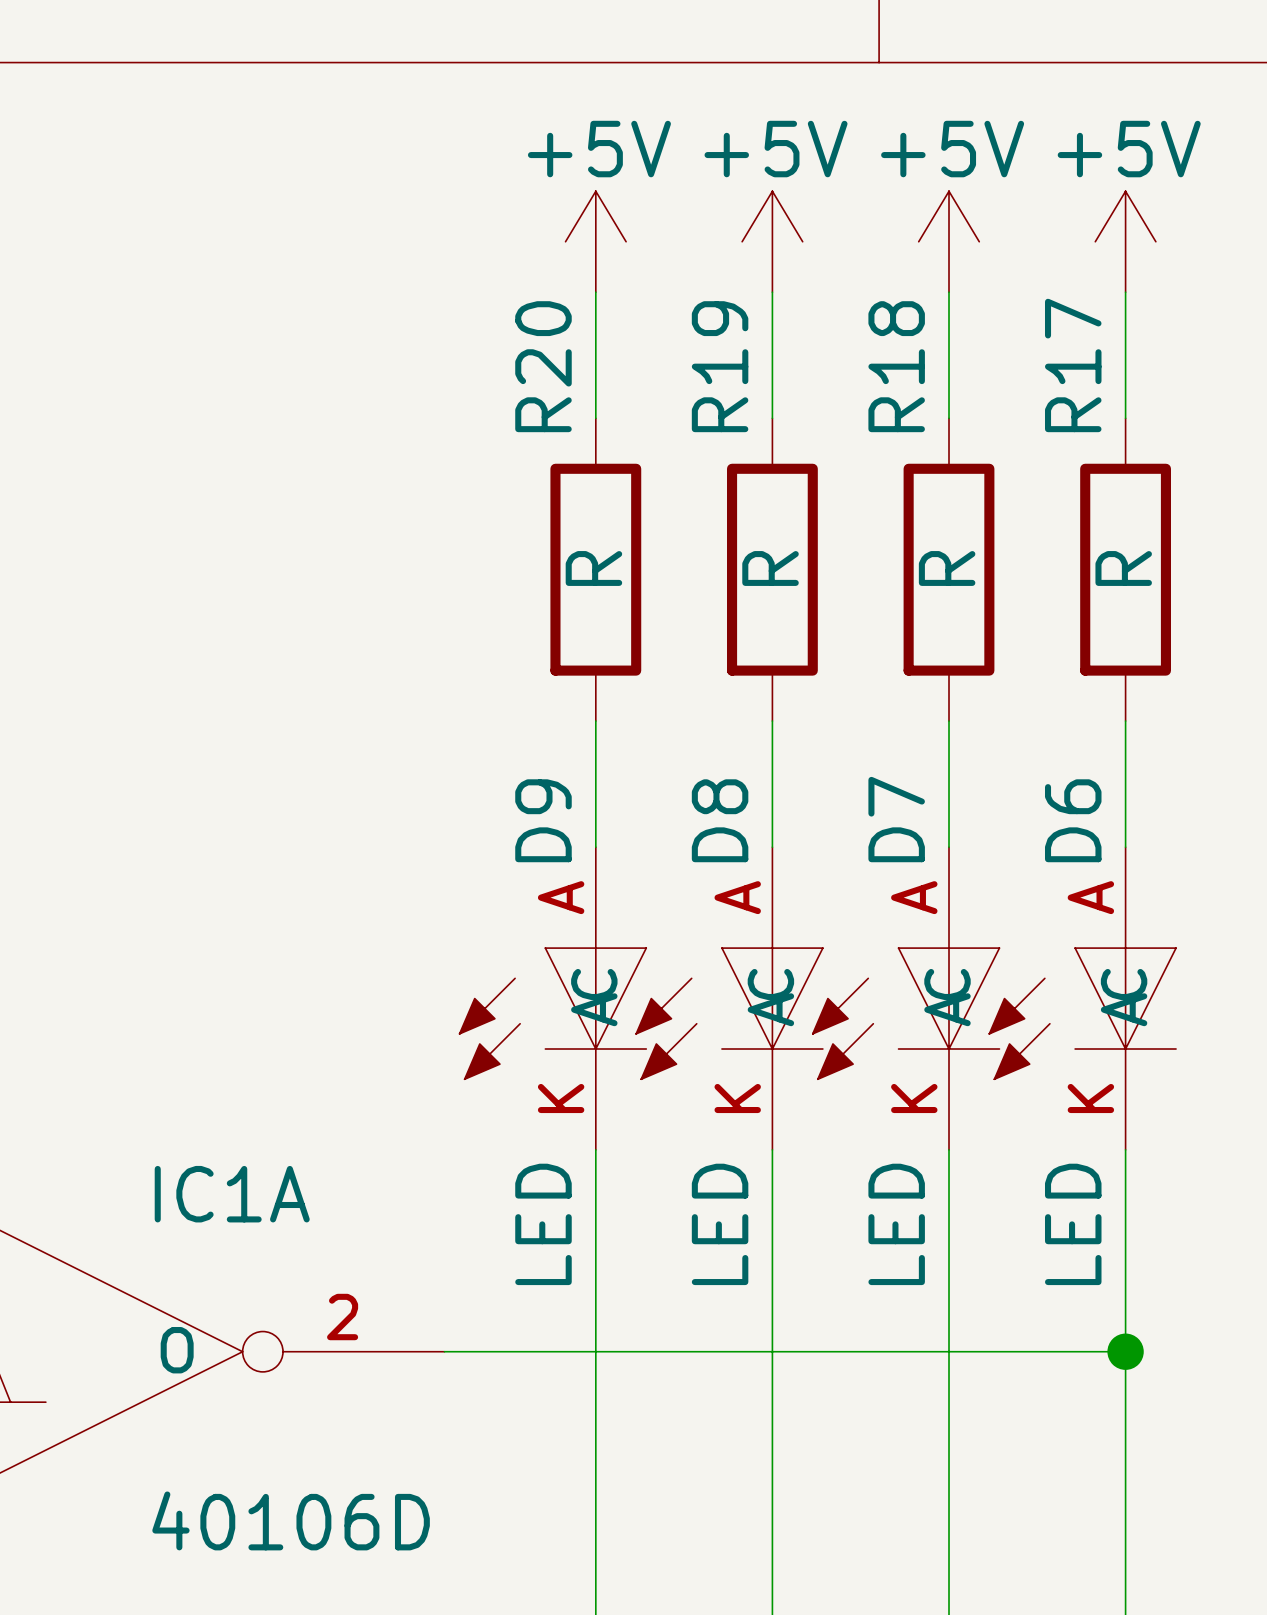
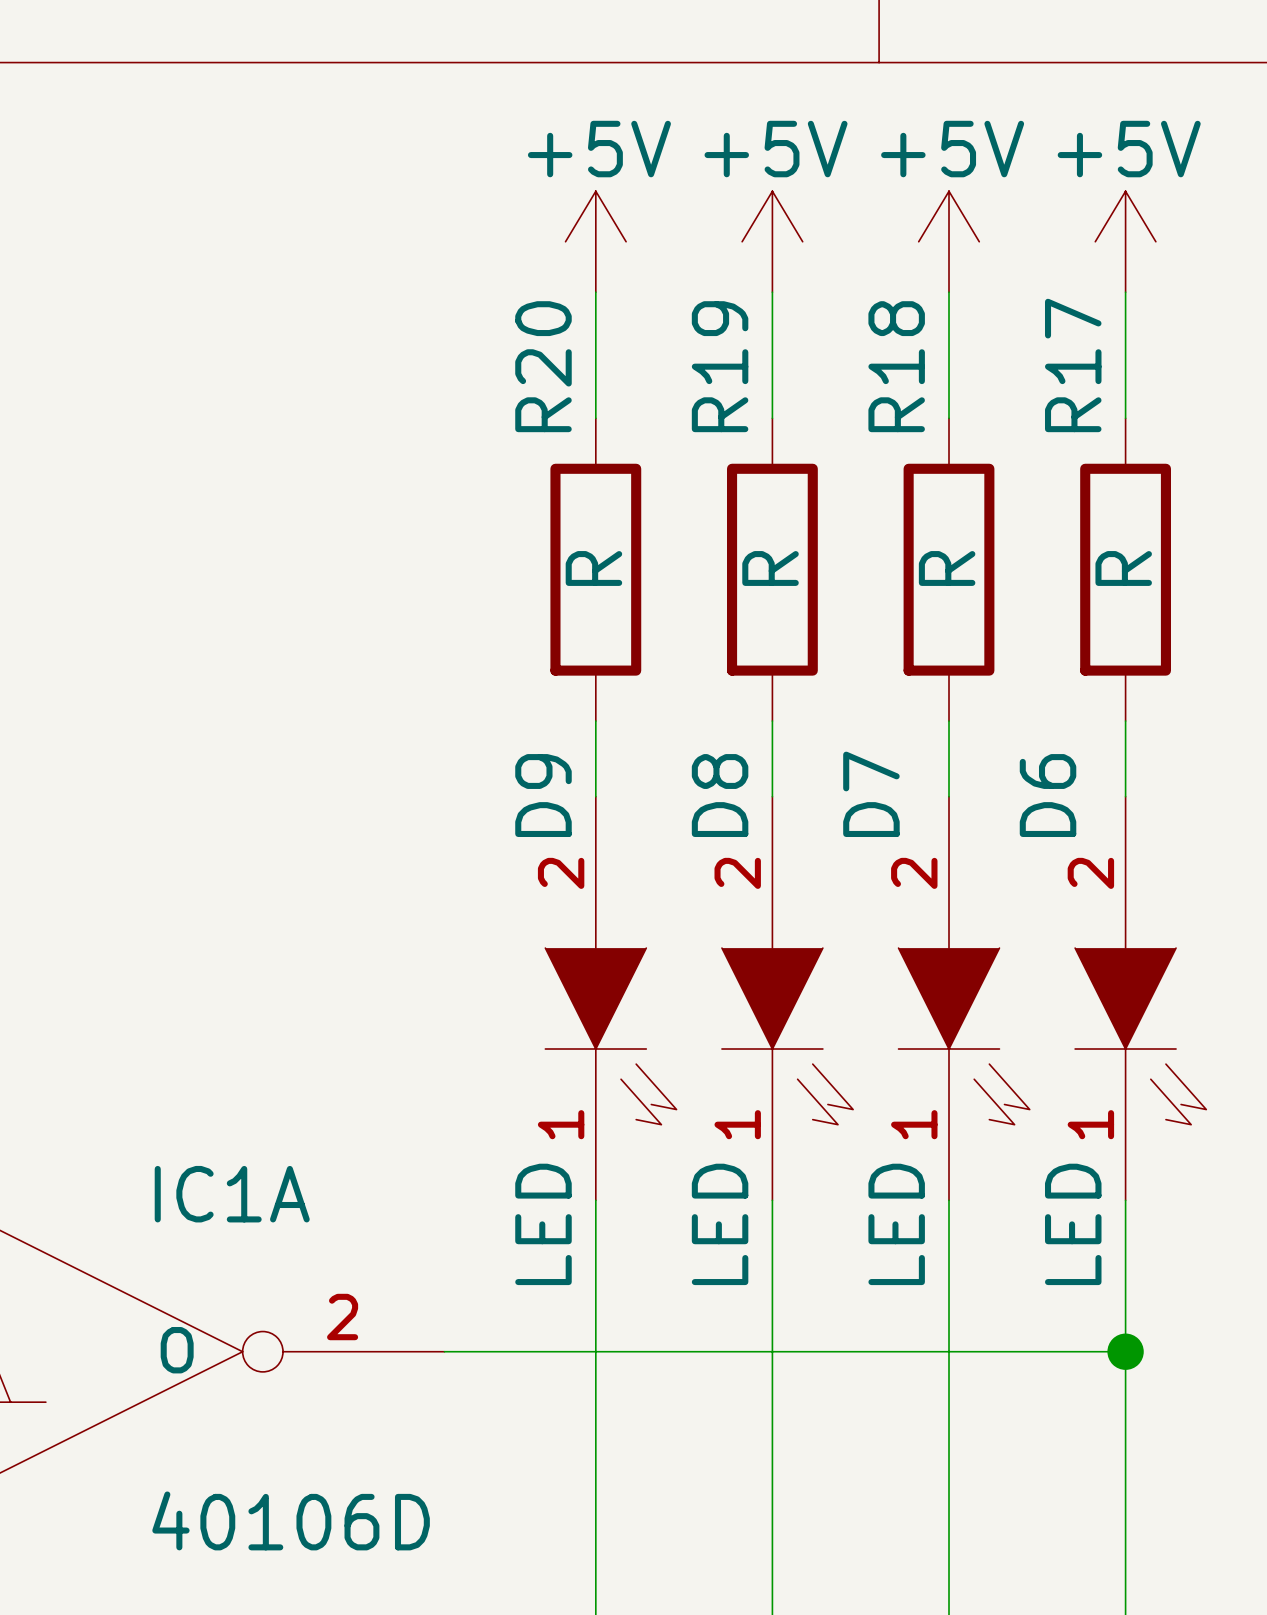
D7 name position: D7 (896, 819) -> D7 (871, 794)
D6 name position: D6 (1073, 820) -> D6 (1048, 795)
D9 symbol: [459, 847, 647, 1150] -> [545, 796, 677, 1201]
D8 symbol: [636, 847, 823, 1150] -> [721, 796, 854, 1201]
D7 symbol: [812, 847, 1000, 1150] -> [898, 796, 1030, 1201]
D6 symbol: [989, 847, 1177, 1150] -> [1075, 796, 1207, 1201]

